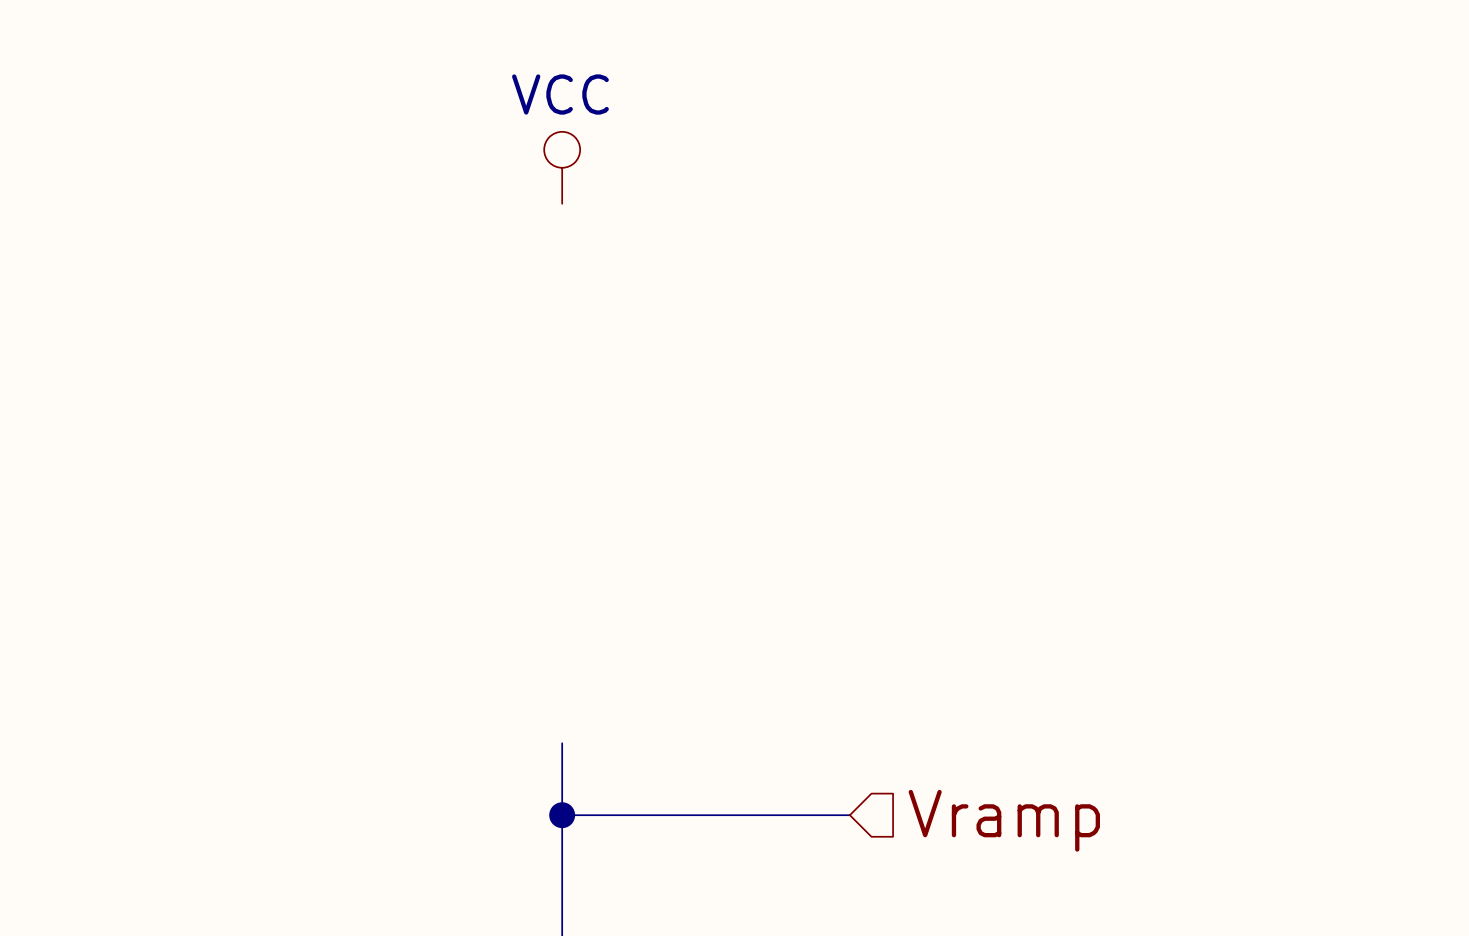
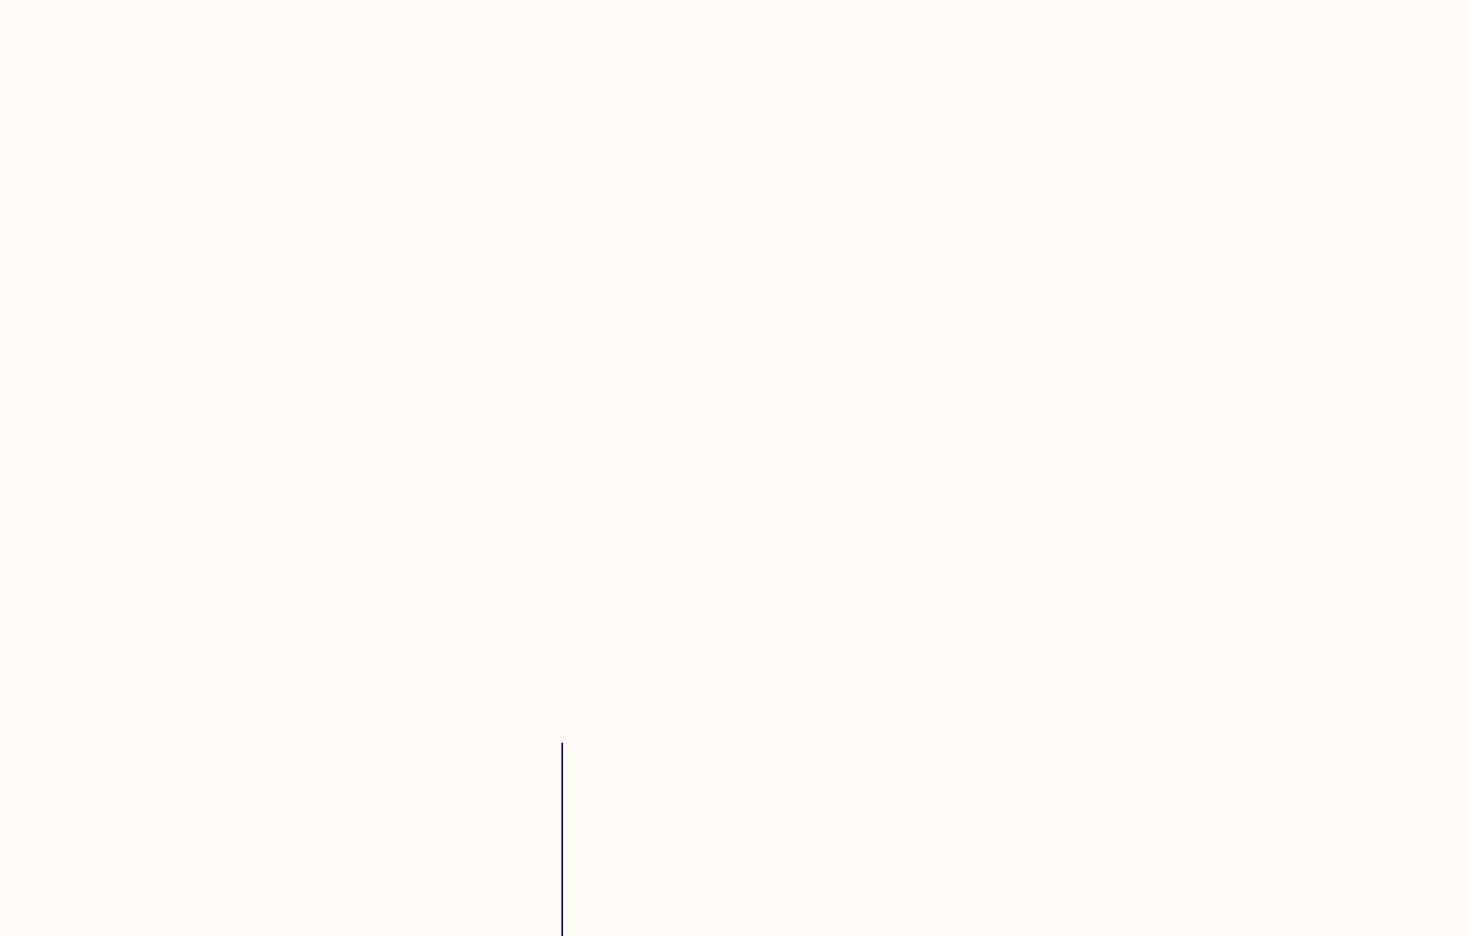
power symbol: VCC (562, 167) -> none
wire: (562, 815) (849, 815) -> none
junction: (562, 815) -> none
hierarchical label: Vramp (1004, 820) -> none

